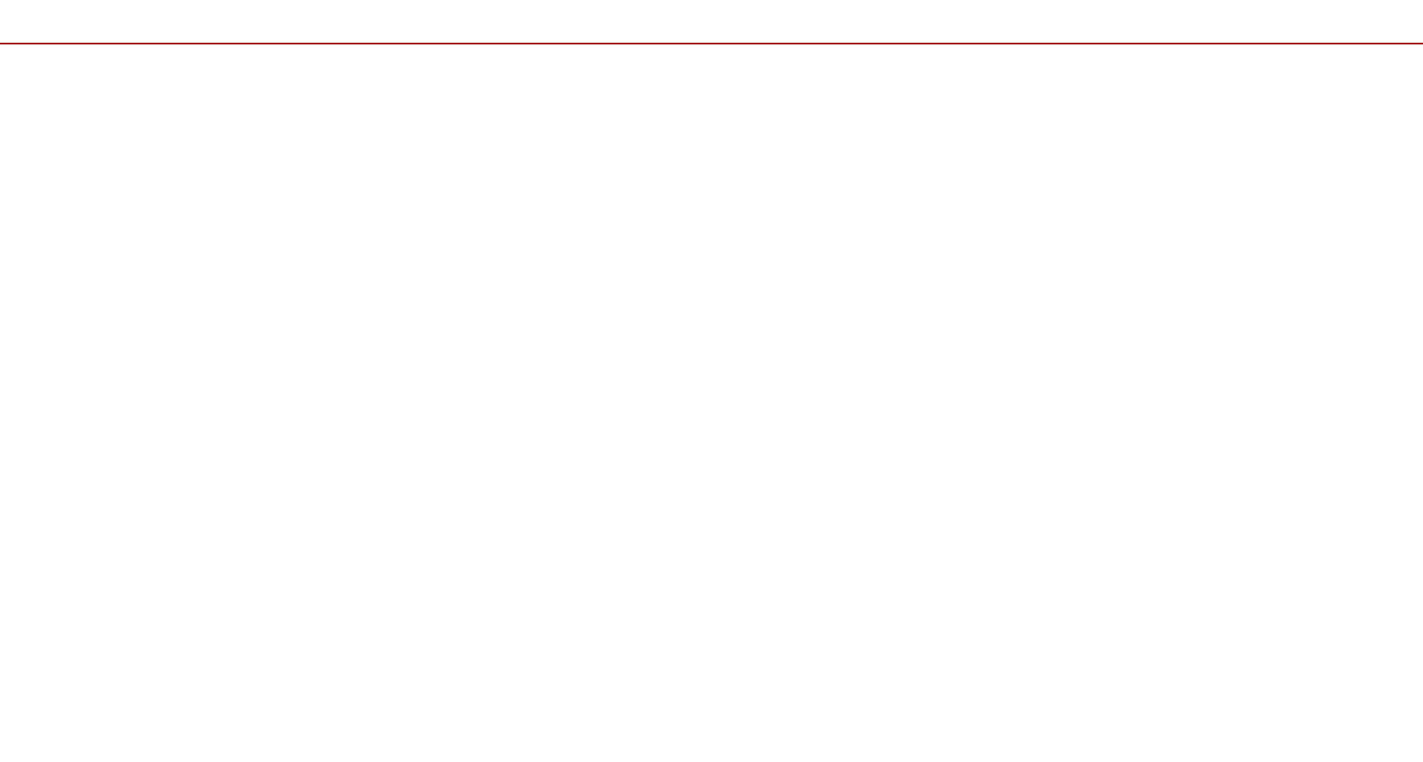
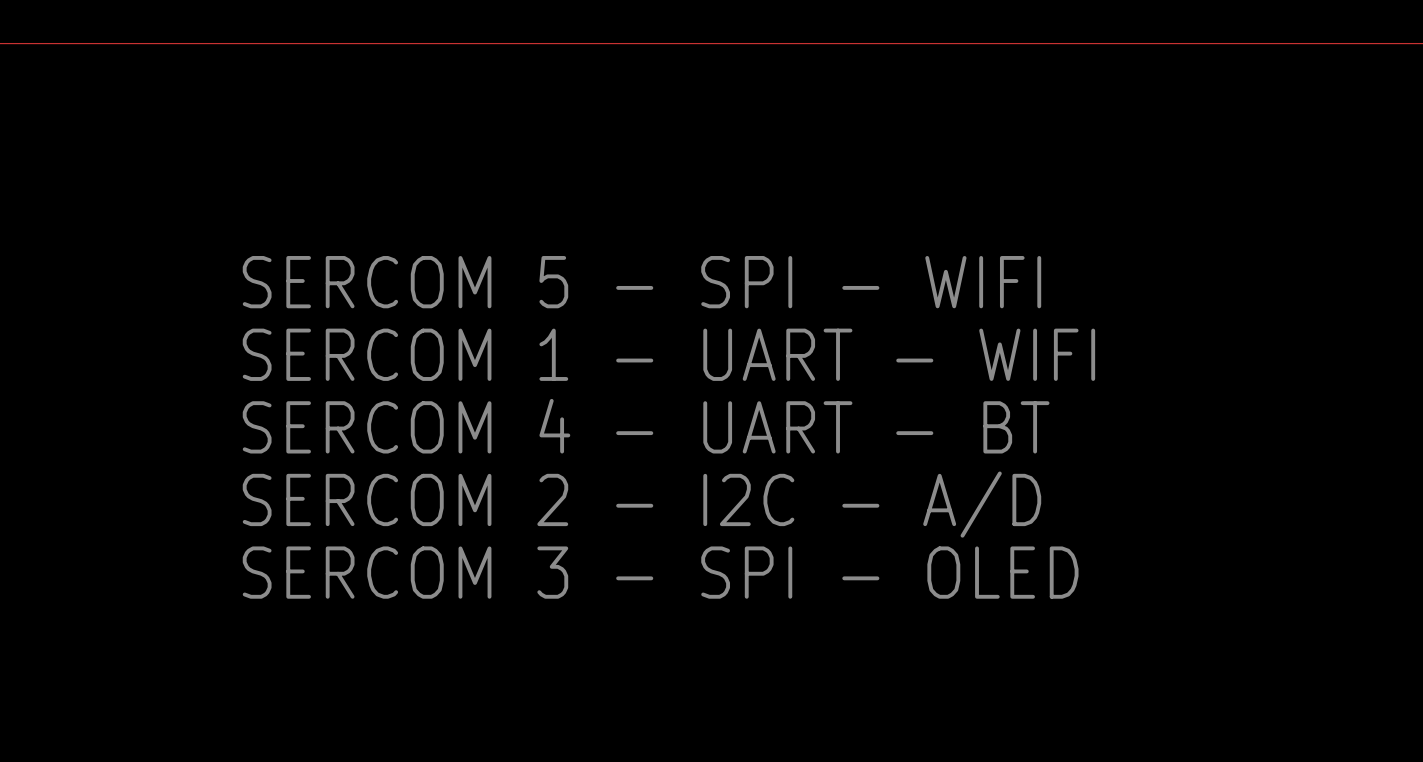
text: none -> SERCOM 5 - SPI - WIFI (641, 282)
text: none -> SERCOM 1 - UART - WIFI (668, 354)
text: none -> SERCOM 4 - UART - BT (646, 426)
text: none -> SERCOM 2 - I2C - A/D (641, 504)
text: none -> SERCOM 3 - SPI - OLED (660, 572)

